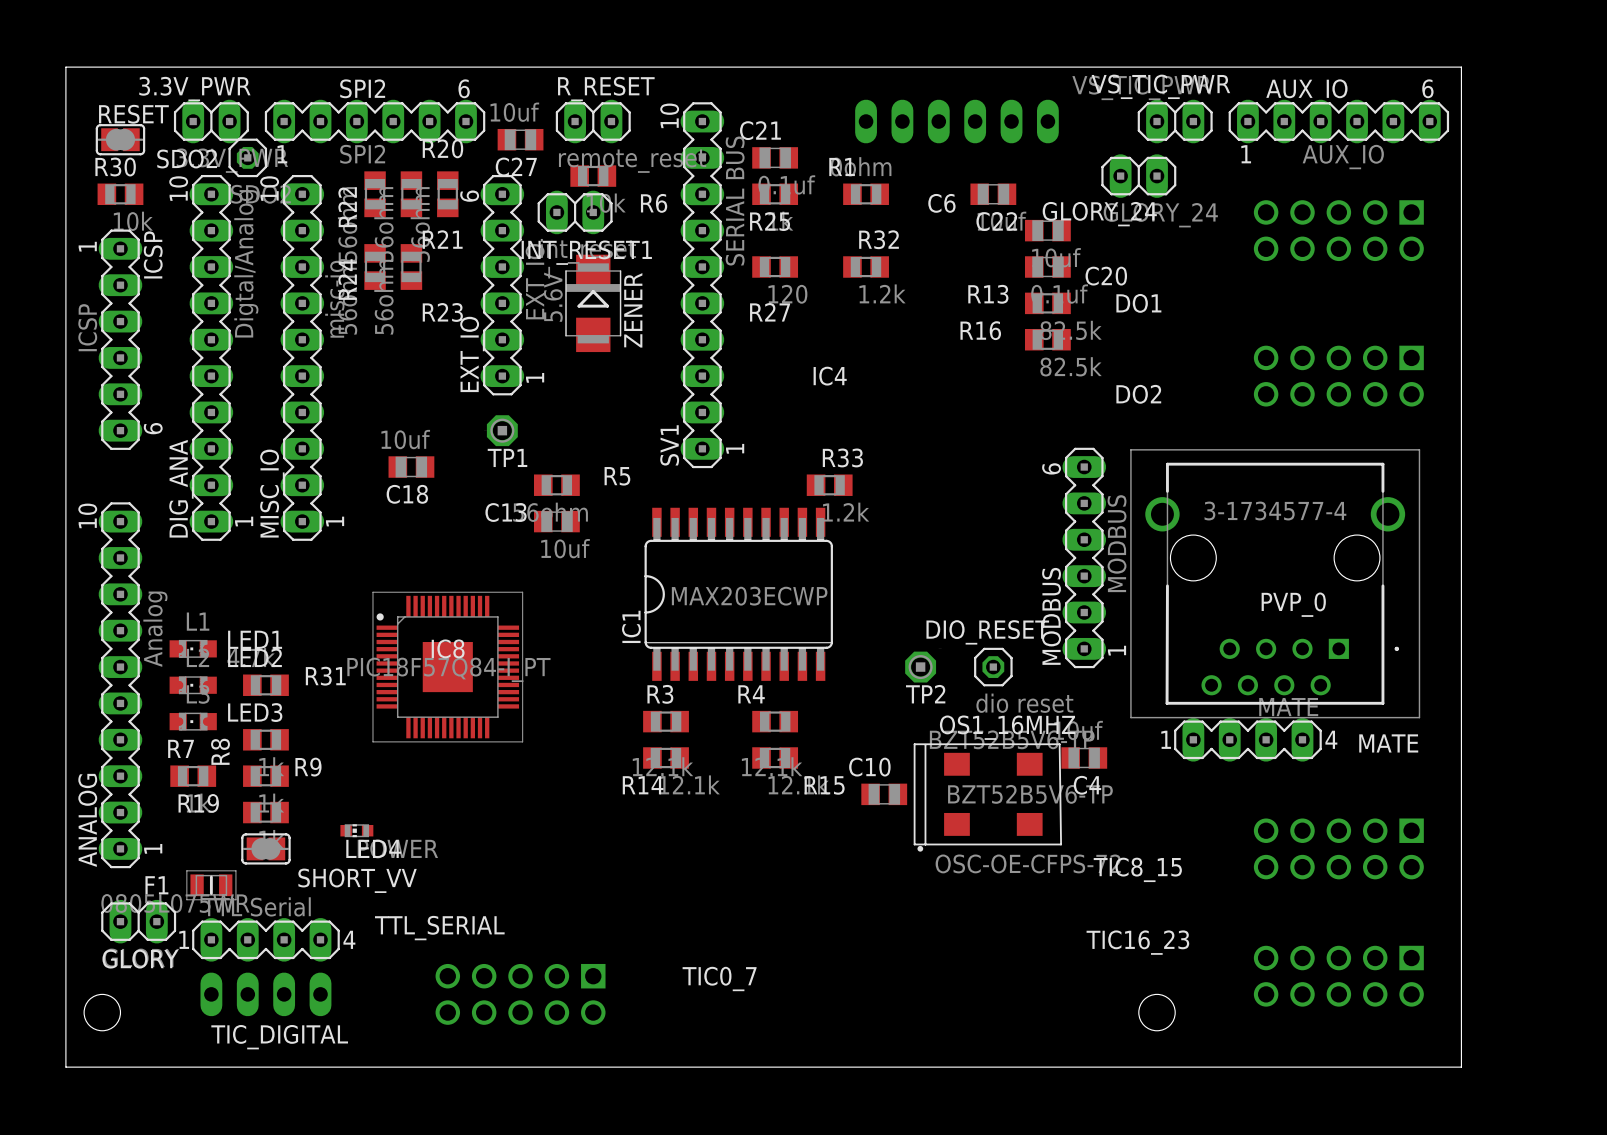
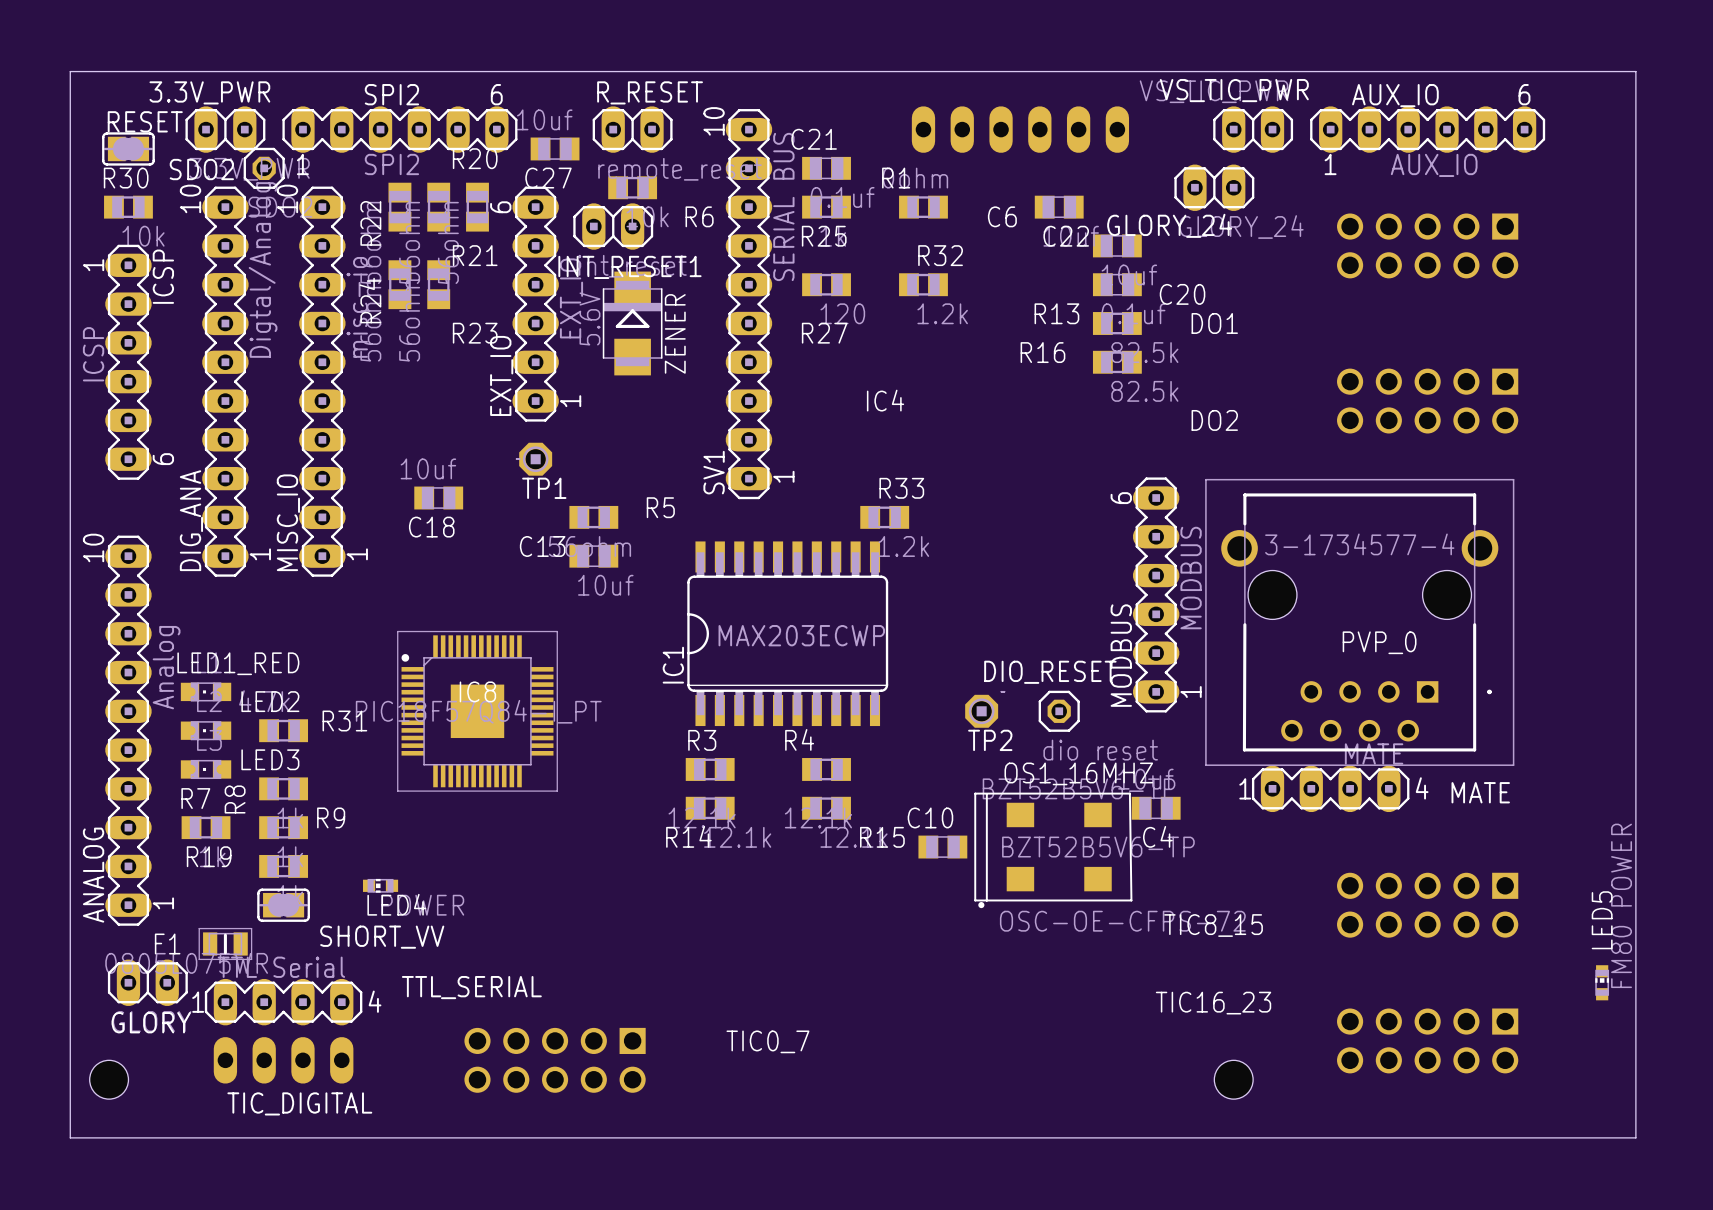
board edge: (1461, 67) (1461, 1067) -> (1558, 71) (1635, 71) (1635, 1137) (1558, 1137)
LED1 name: LED1 (255, 639) -> LED1_RED (238, 663)
LED5: none -> FM80 POWER (1602, 982)

